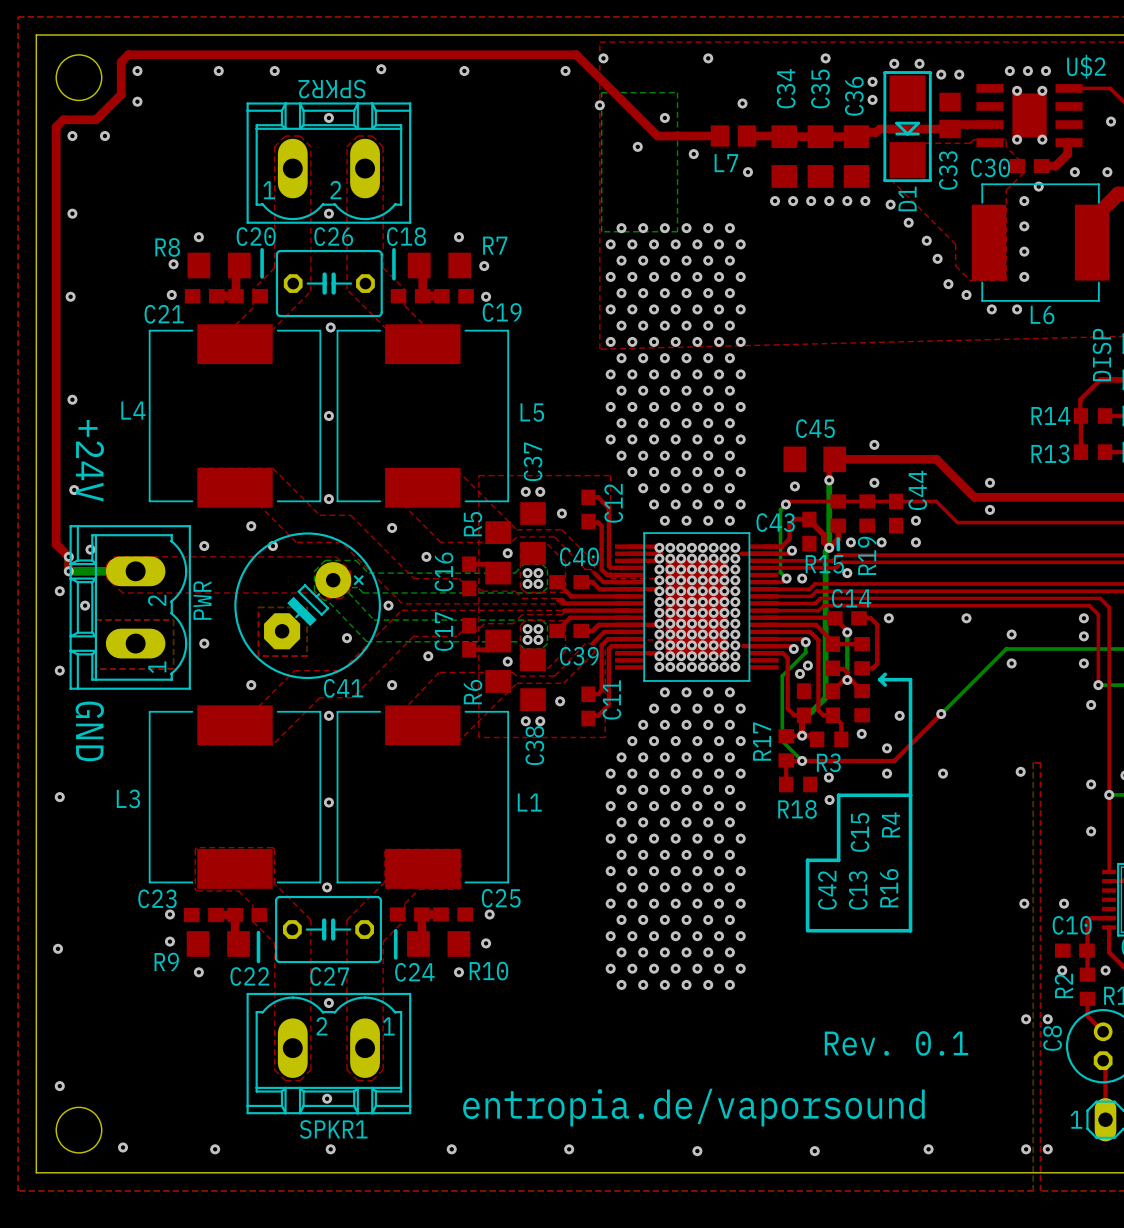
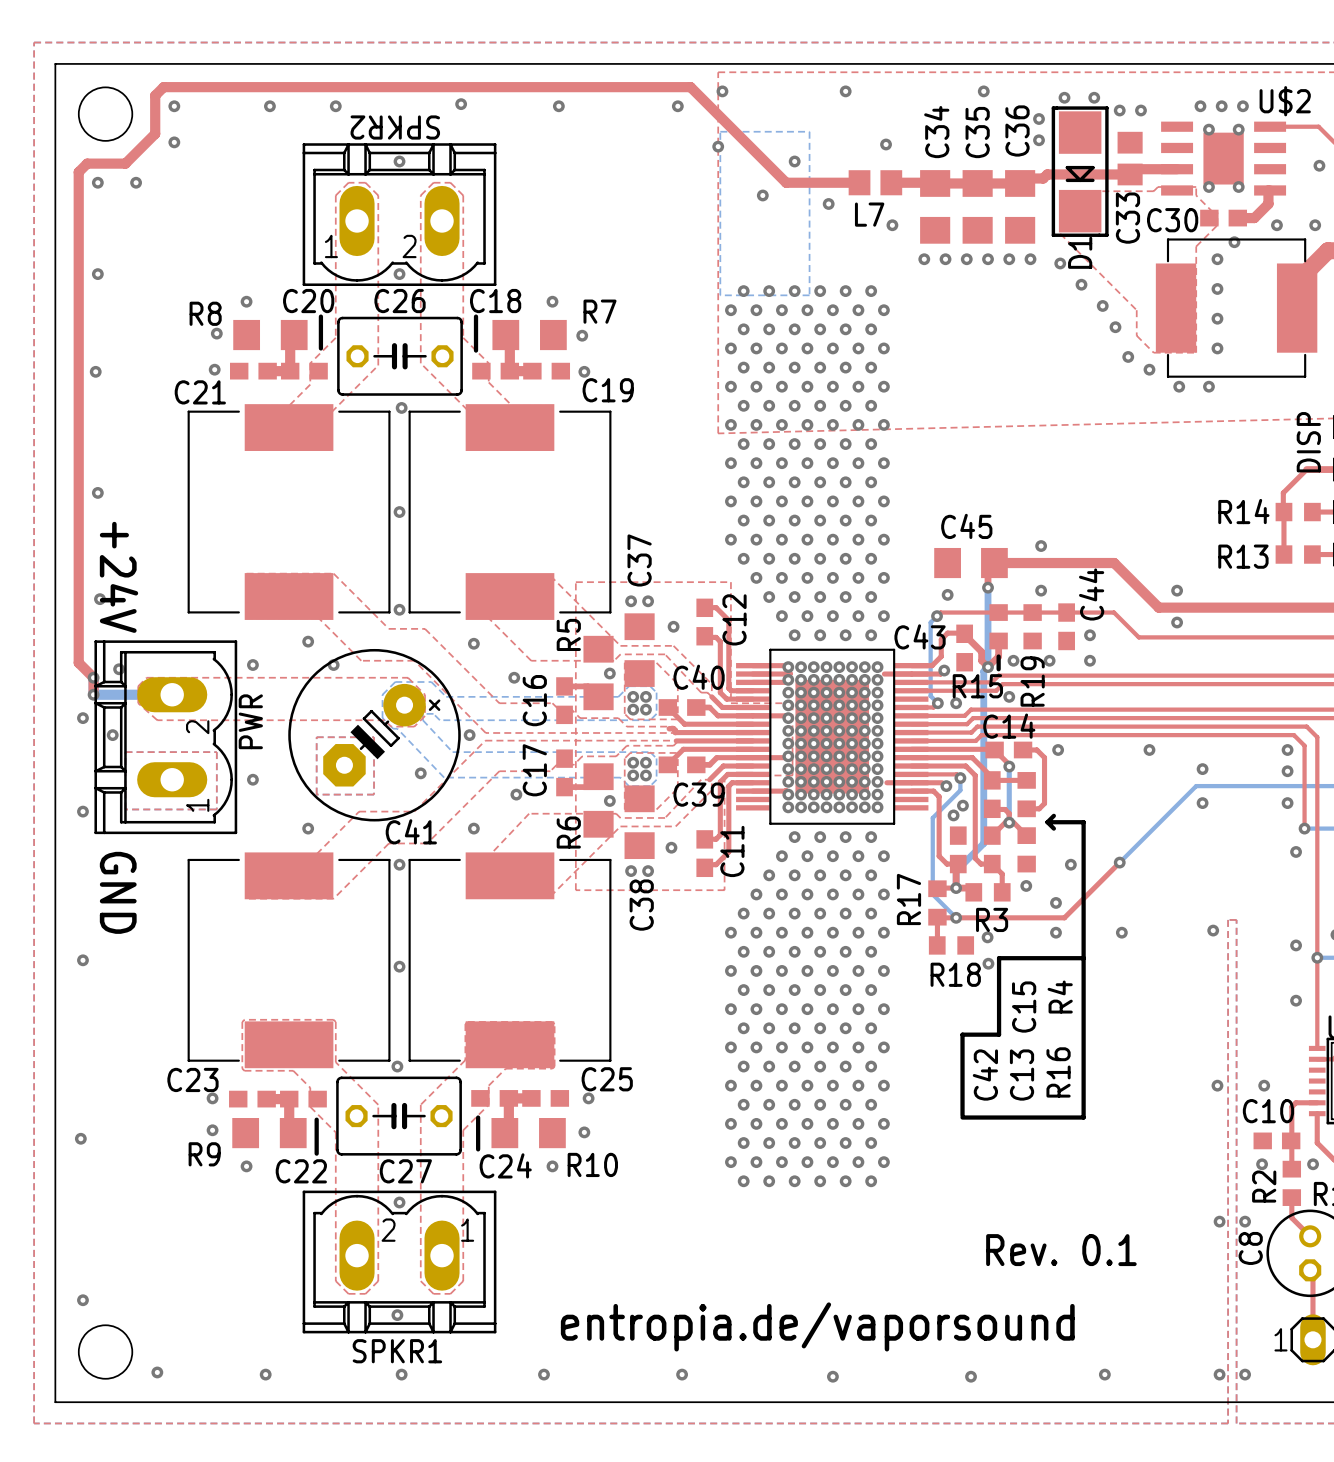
L6 name: L6 (1042, 314) -> none
L4 name: L4 (133, 410) -> none
L5 name: L5 (532, 412) -> none
L3 name: L3 (128, 798) -> none
L1 name: L1 (529, 802) -> none

